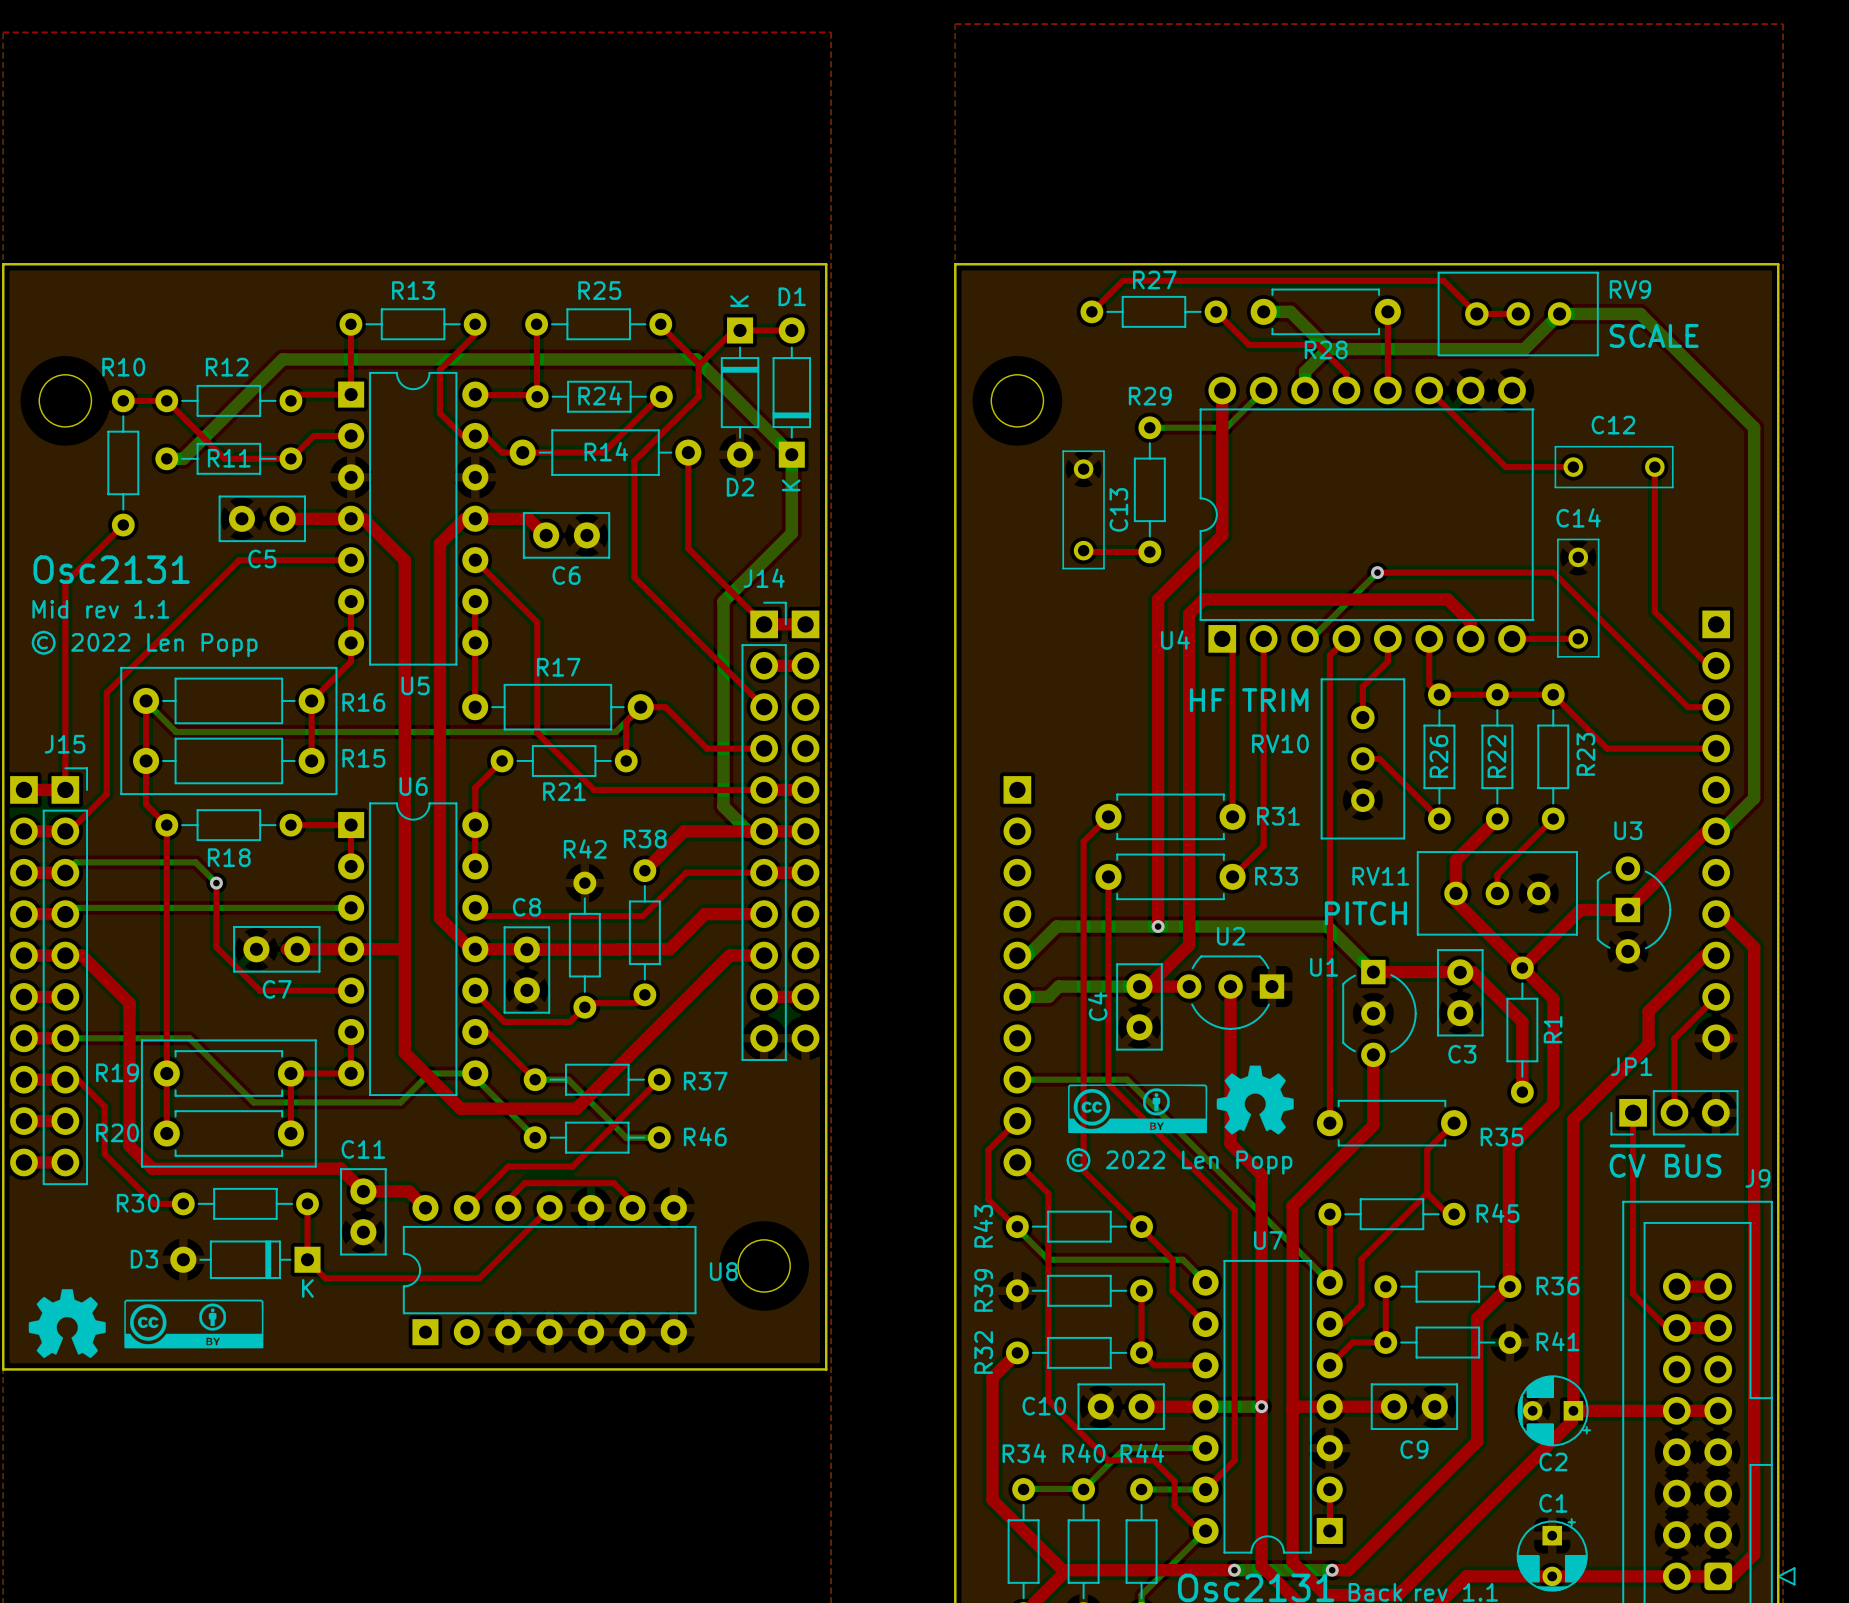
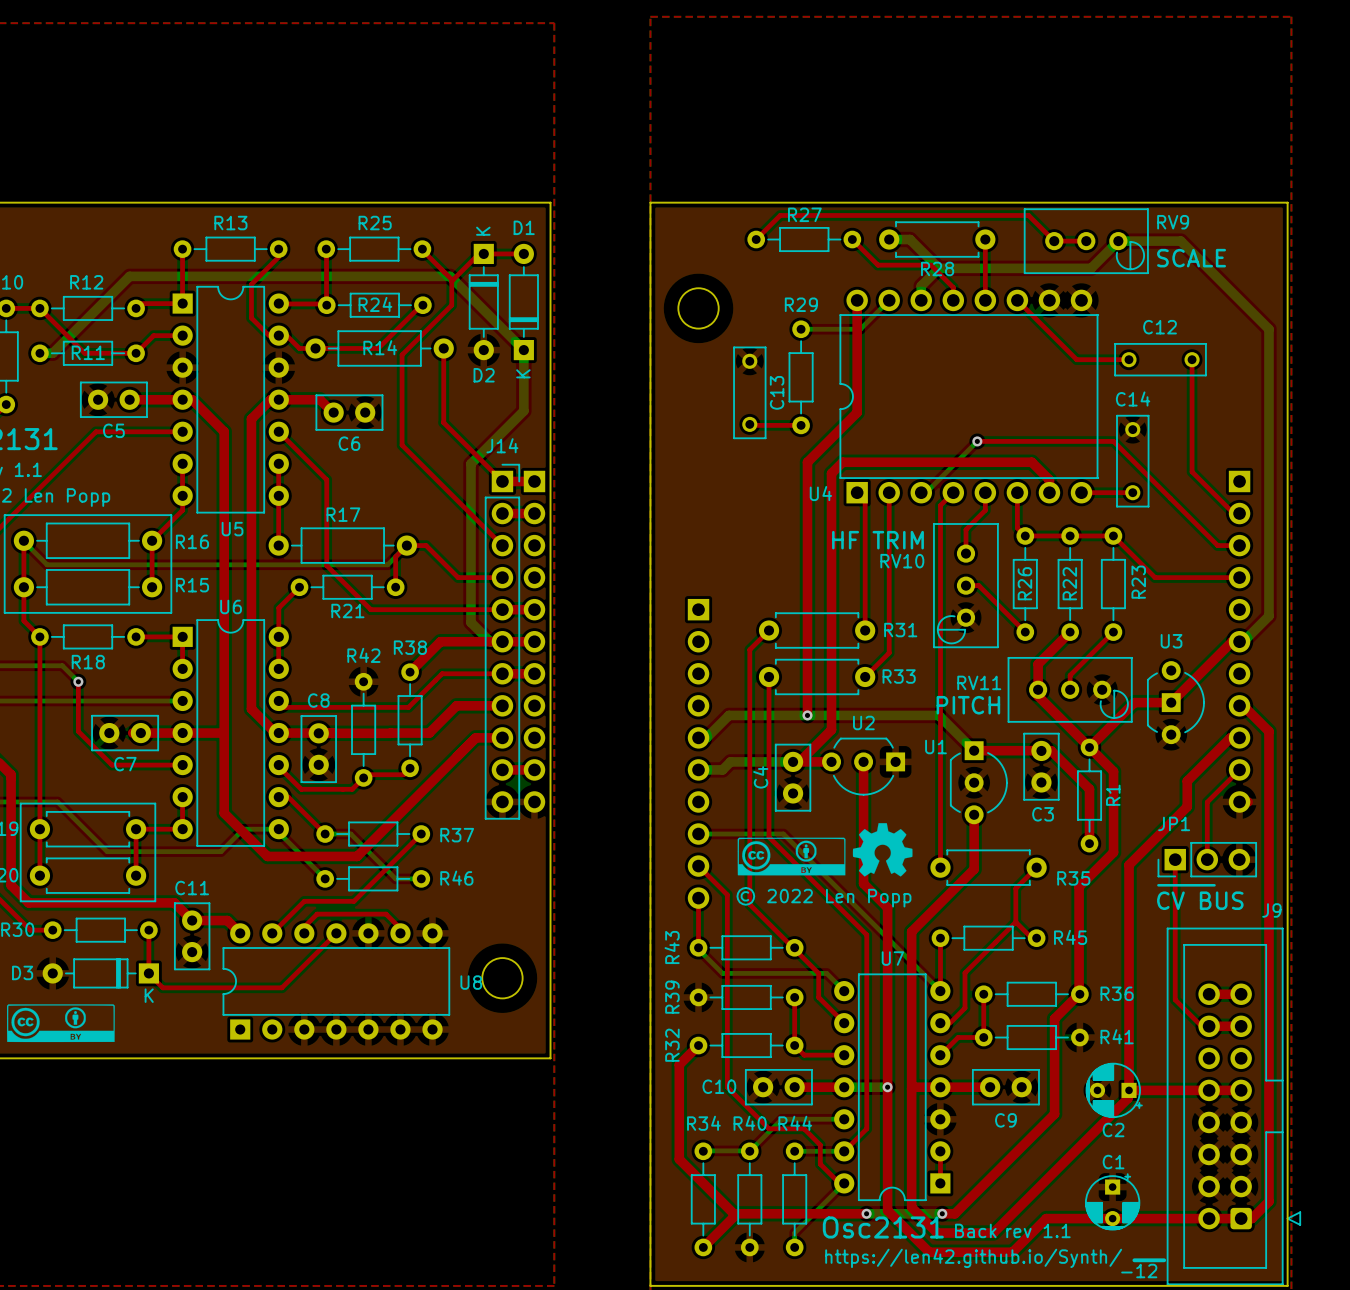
RV9 footprint: [1437, 271, 1599, 357] -> [1023, 208, 1149, 274]
RV10 footprint: [1320, 678, 1406, 840] -> [933, 523, 999, 649]
RV11 footprint: [1416, 851, 1578, 936] -> [1007, 657, 1133, 723]
top track: (1017, 1121) (988, 1150) (988, 1199) (1017, 1228) -> none
top track: (1017, 1162) (1048, 1193) (1048, 1400) (1054, 1406) -> (698, 866) (727, 894) (727, 1087)
top track: none -> (698, 898) (698, 947)

